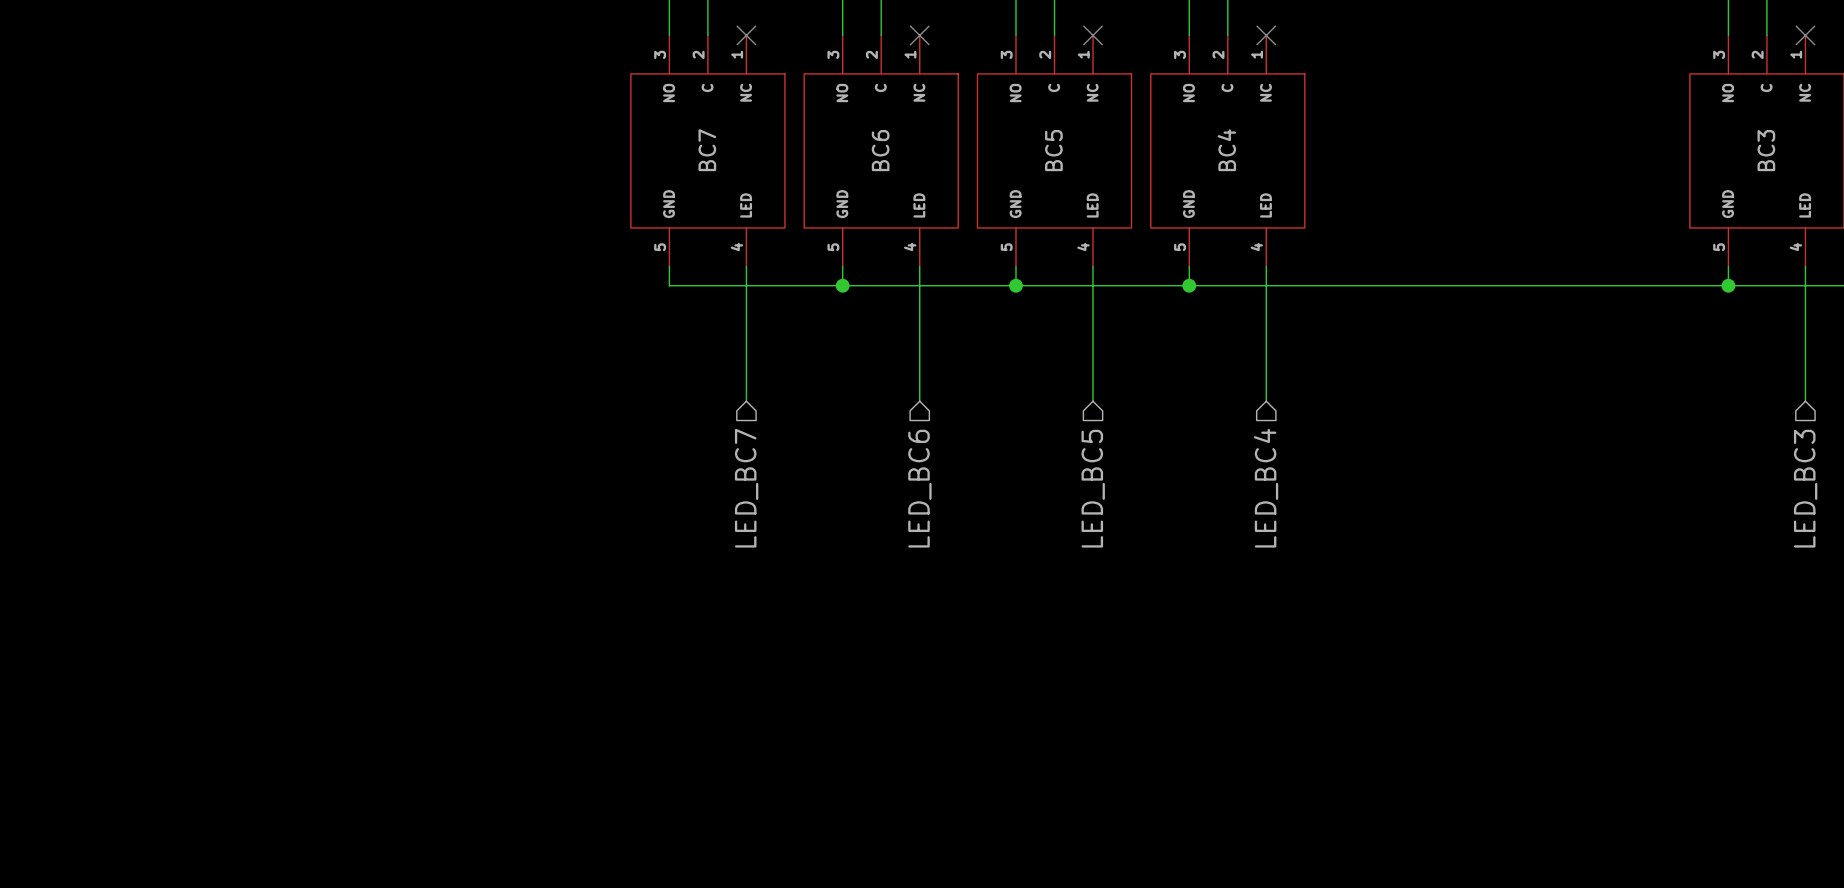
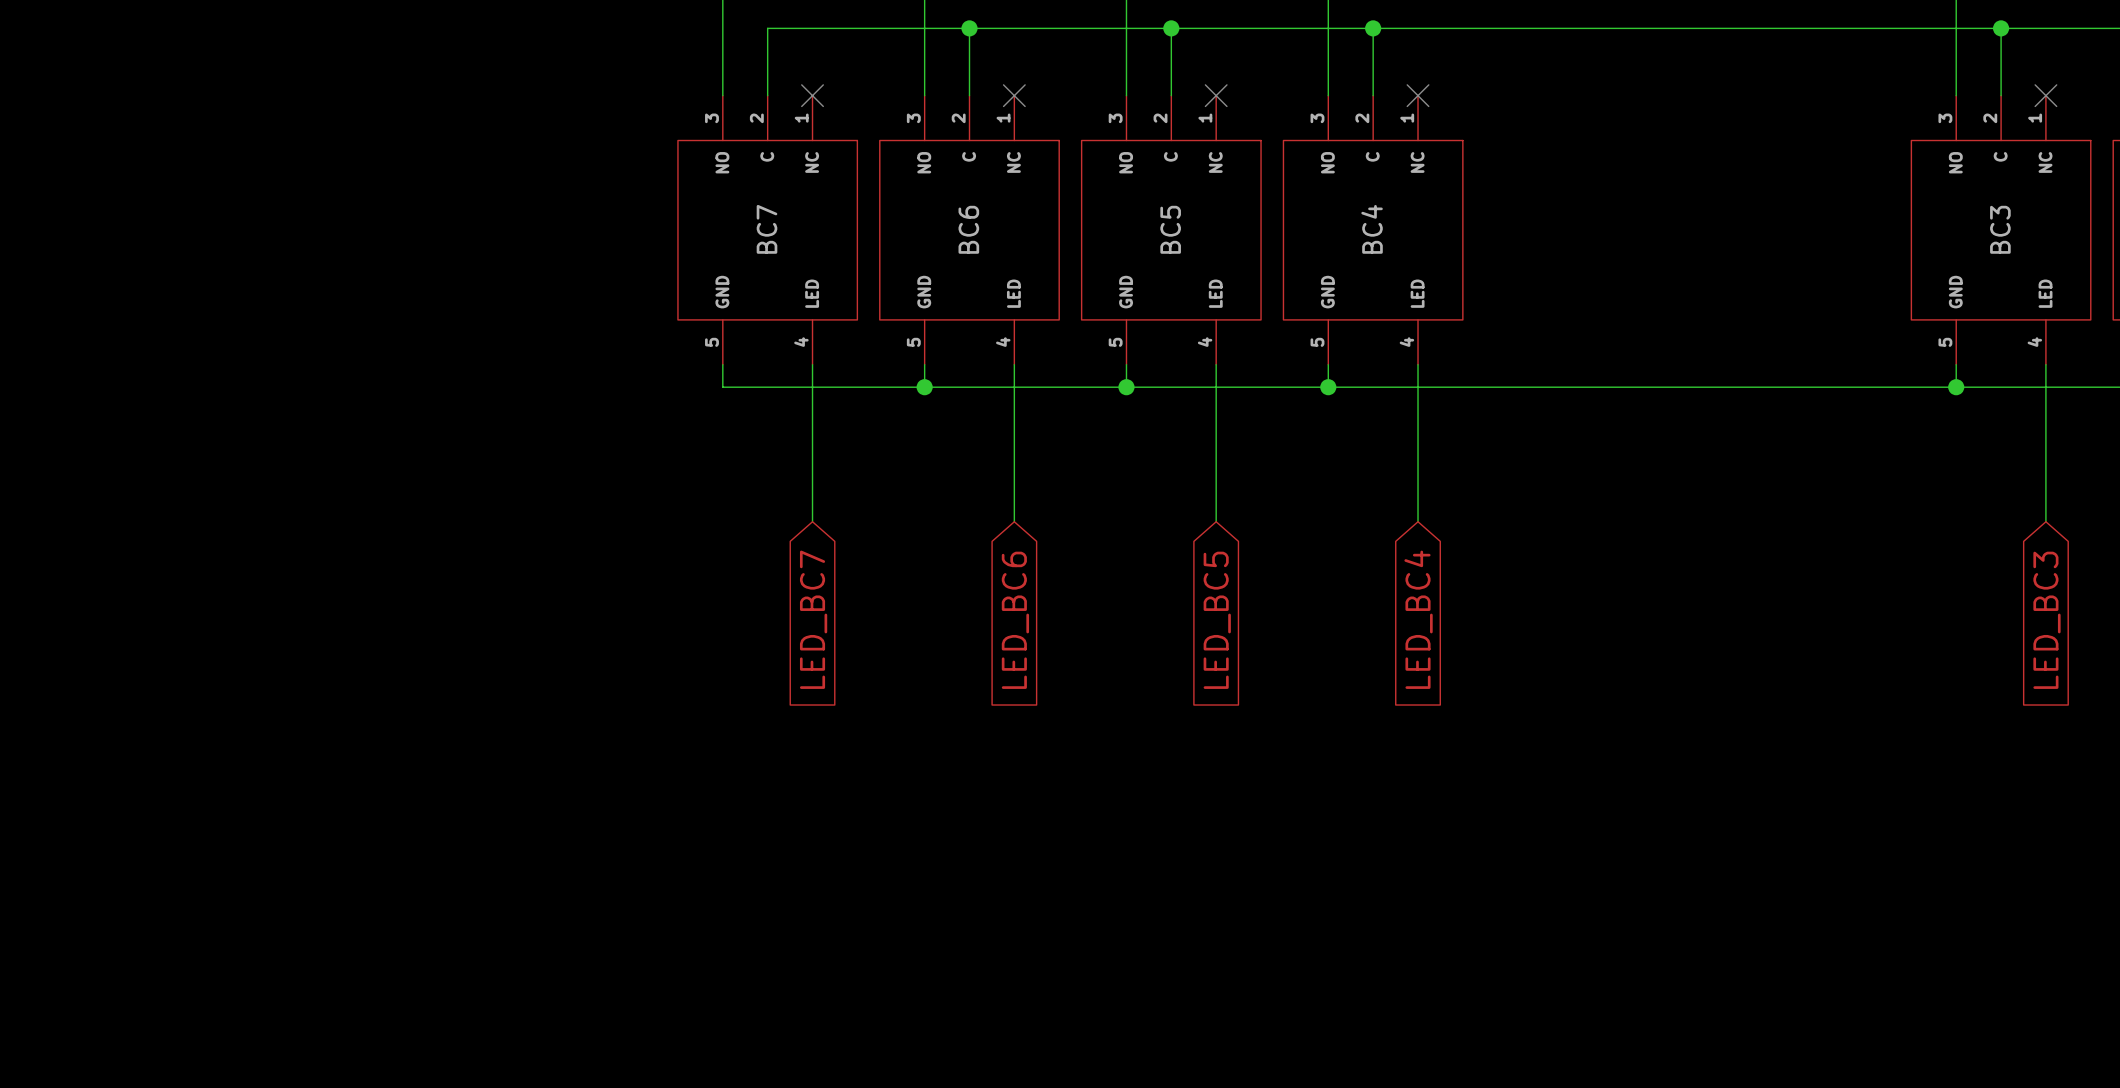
global label: none -> LED_BC7 (813, 619)
global label: none -> LED_BC6 (1015, 620)
global label: none -> LED_BC5 (1217, 620)
global label: none -> LED_BC4 (1418, 619)
global label: none -> LED_BC3 (2047, 620)
hierarchical label: LED_BC7 (746, 488) -> none
hierarchical label: LED_BC6 (919, 488) -> none
hierarchical label: LED_BC5 (1093, 488) -> none
hierarchical label: LED_BC4 (1266, 488) -> none
hierarchical label: LED_BC3 (1805, 488) -> none

